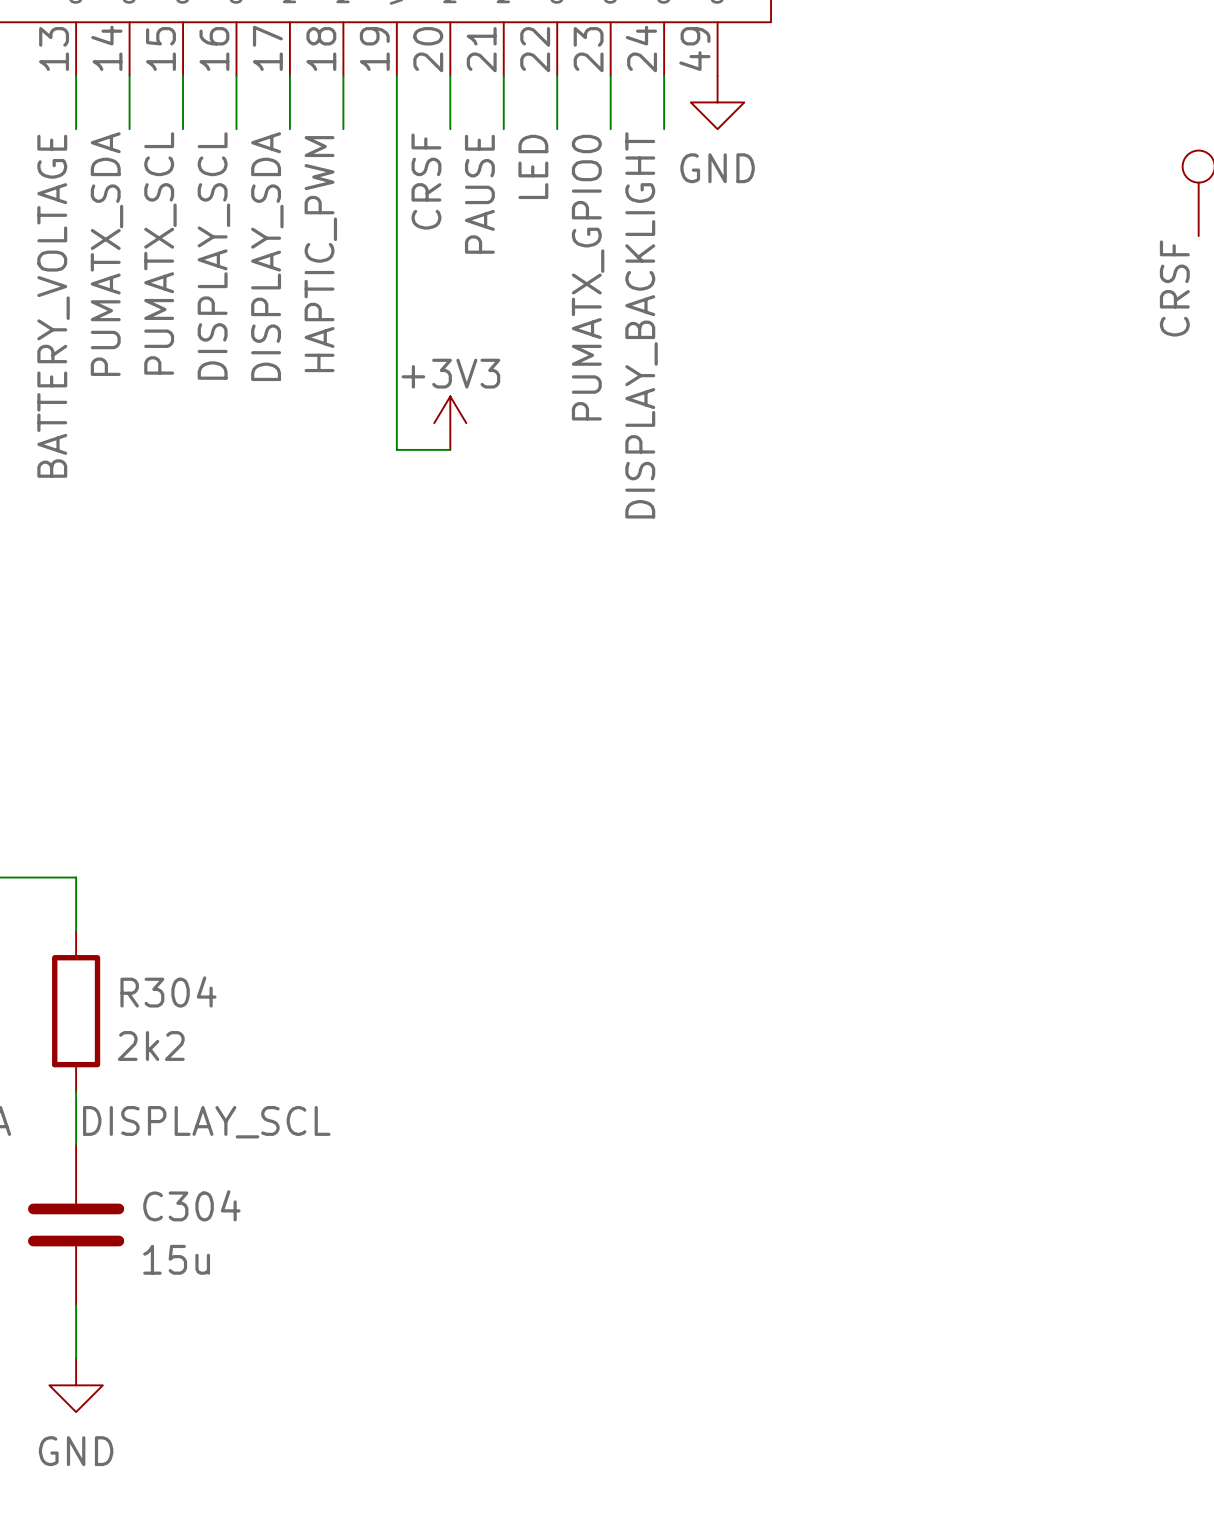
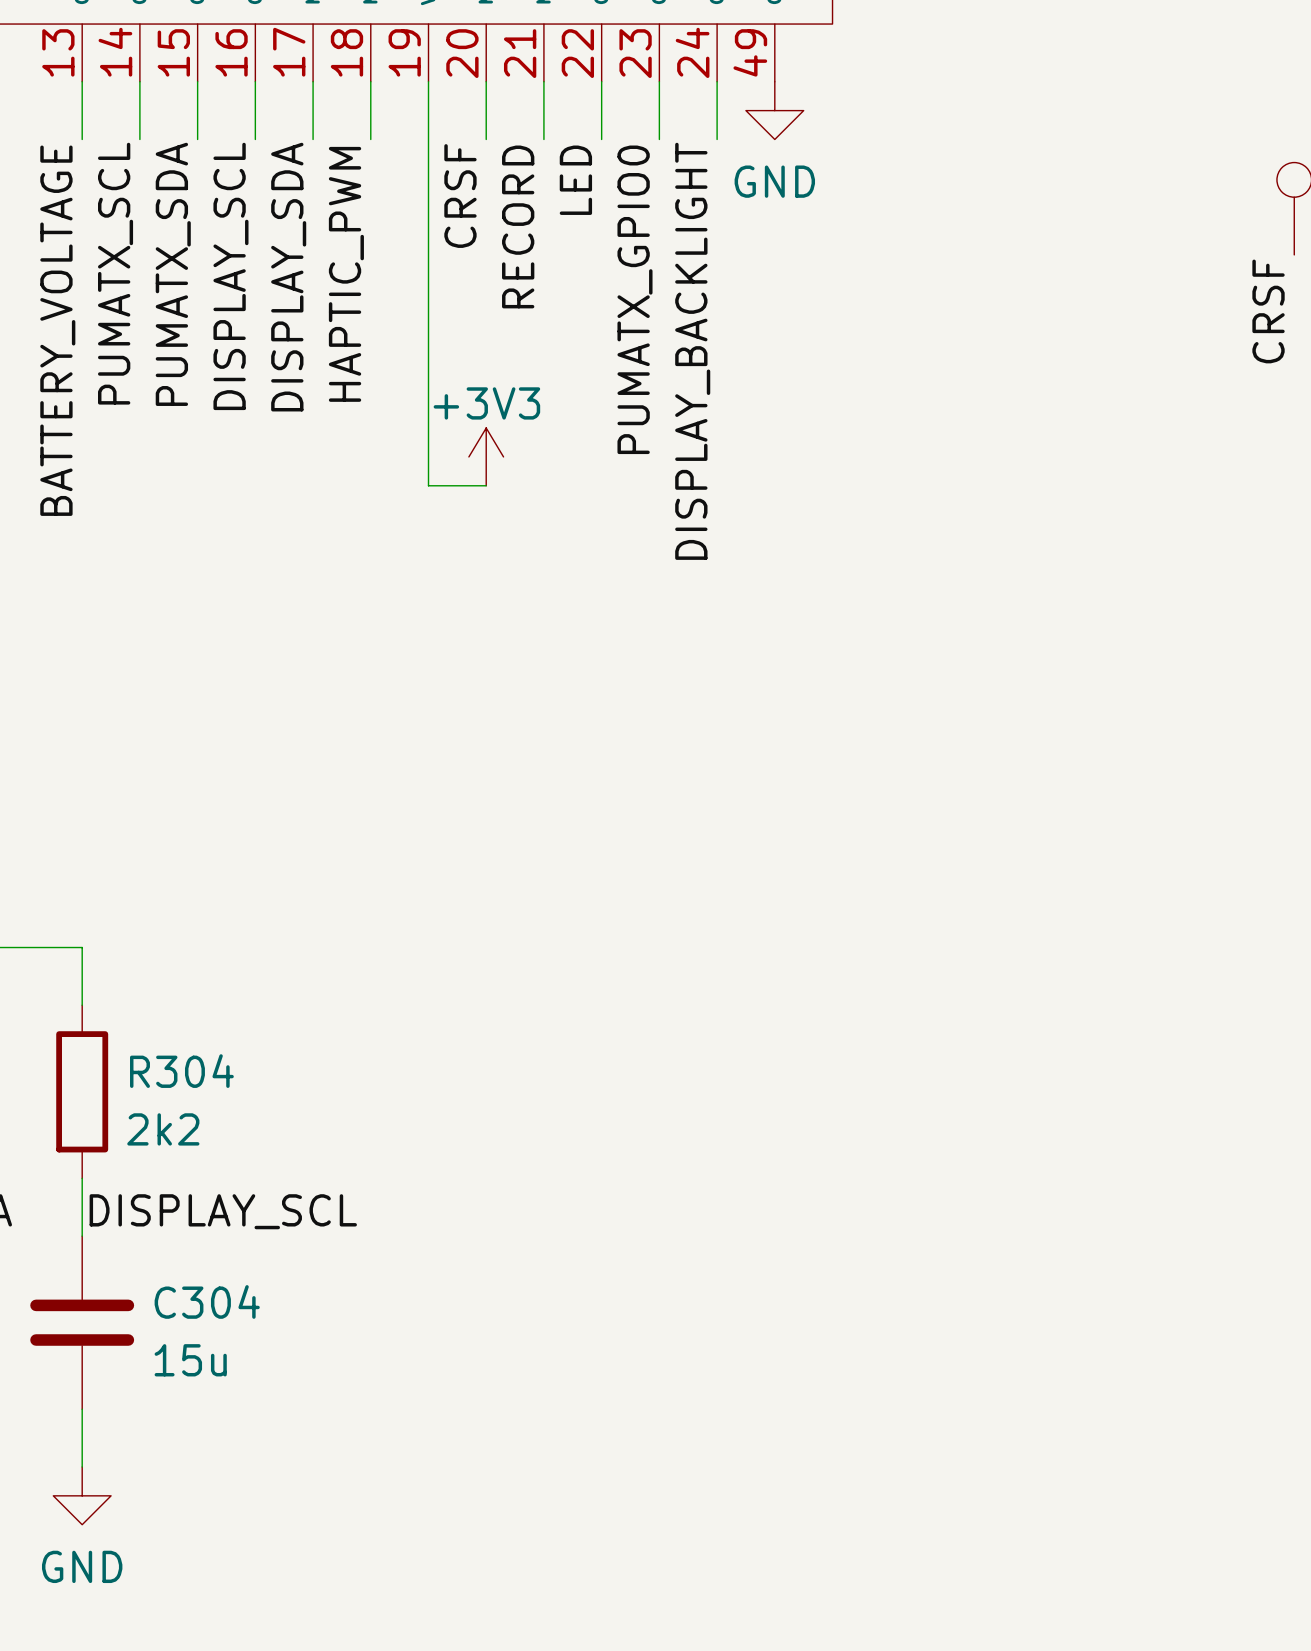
label: PAUSE (479, 194) -> RECORD (518, 226)
label: PUMATX_SCL (160, 253) -> PUMATX_SDA (173, 274)
label: PUMATX_SDA (107, 254) -> PUMATX_SCL (115, 273)

